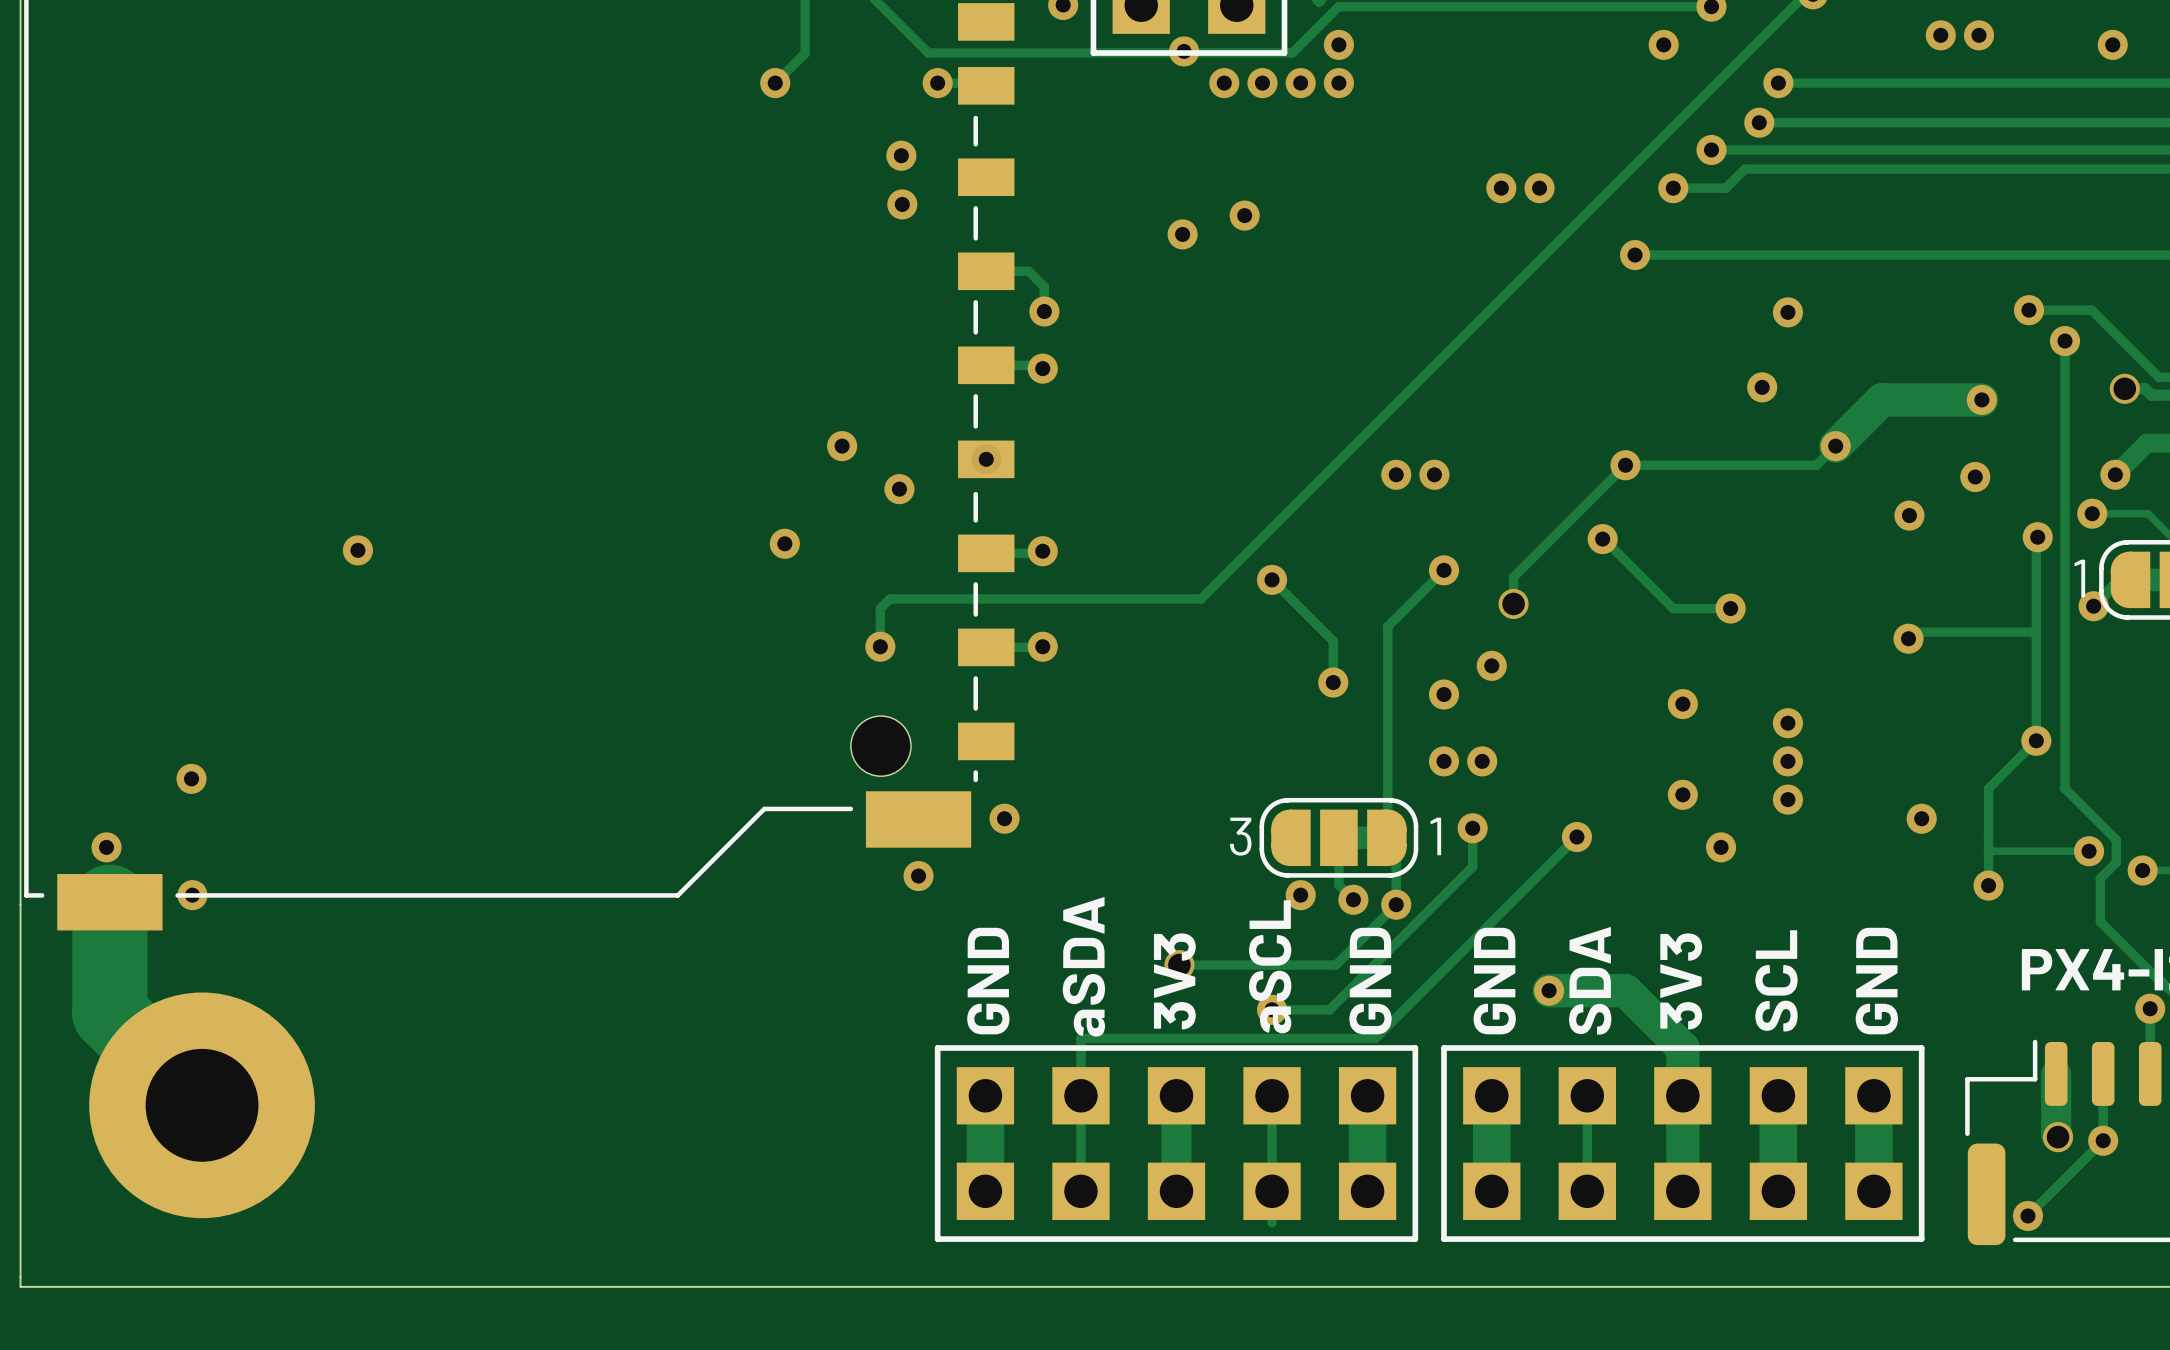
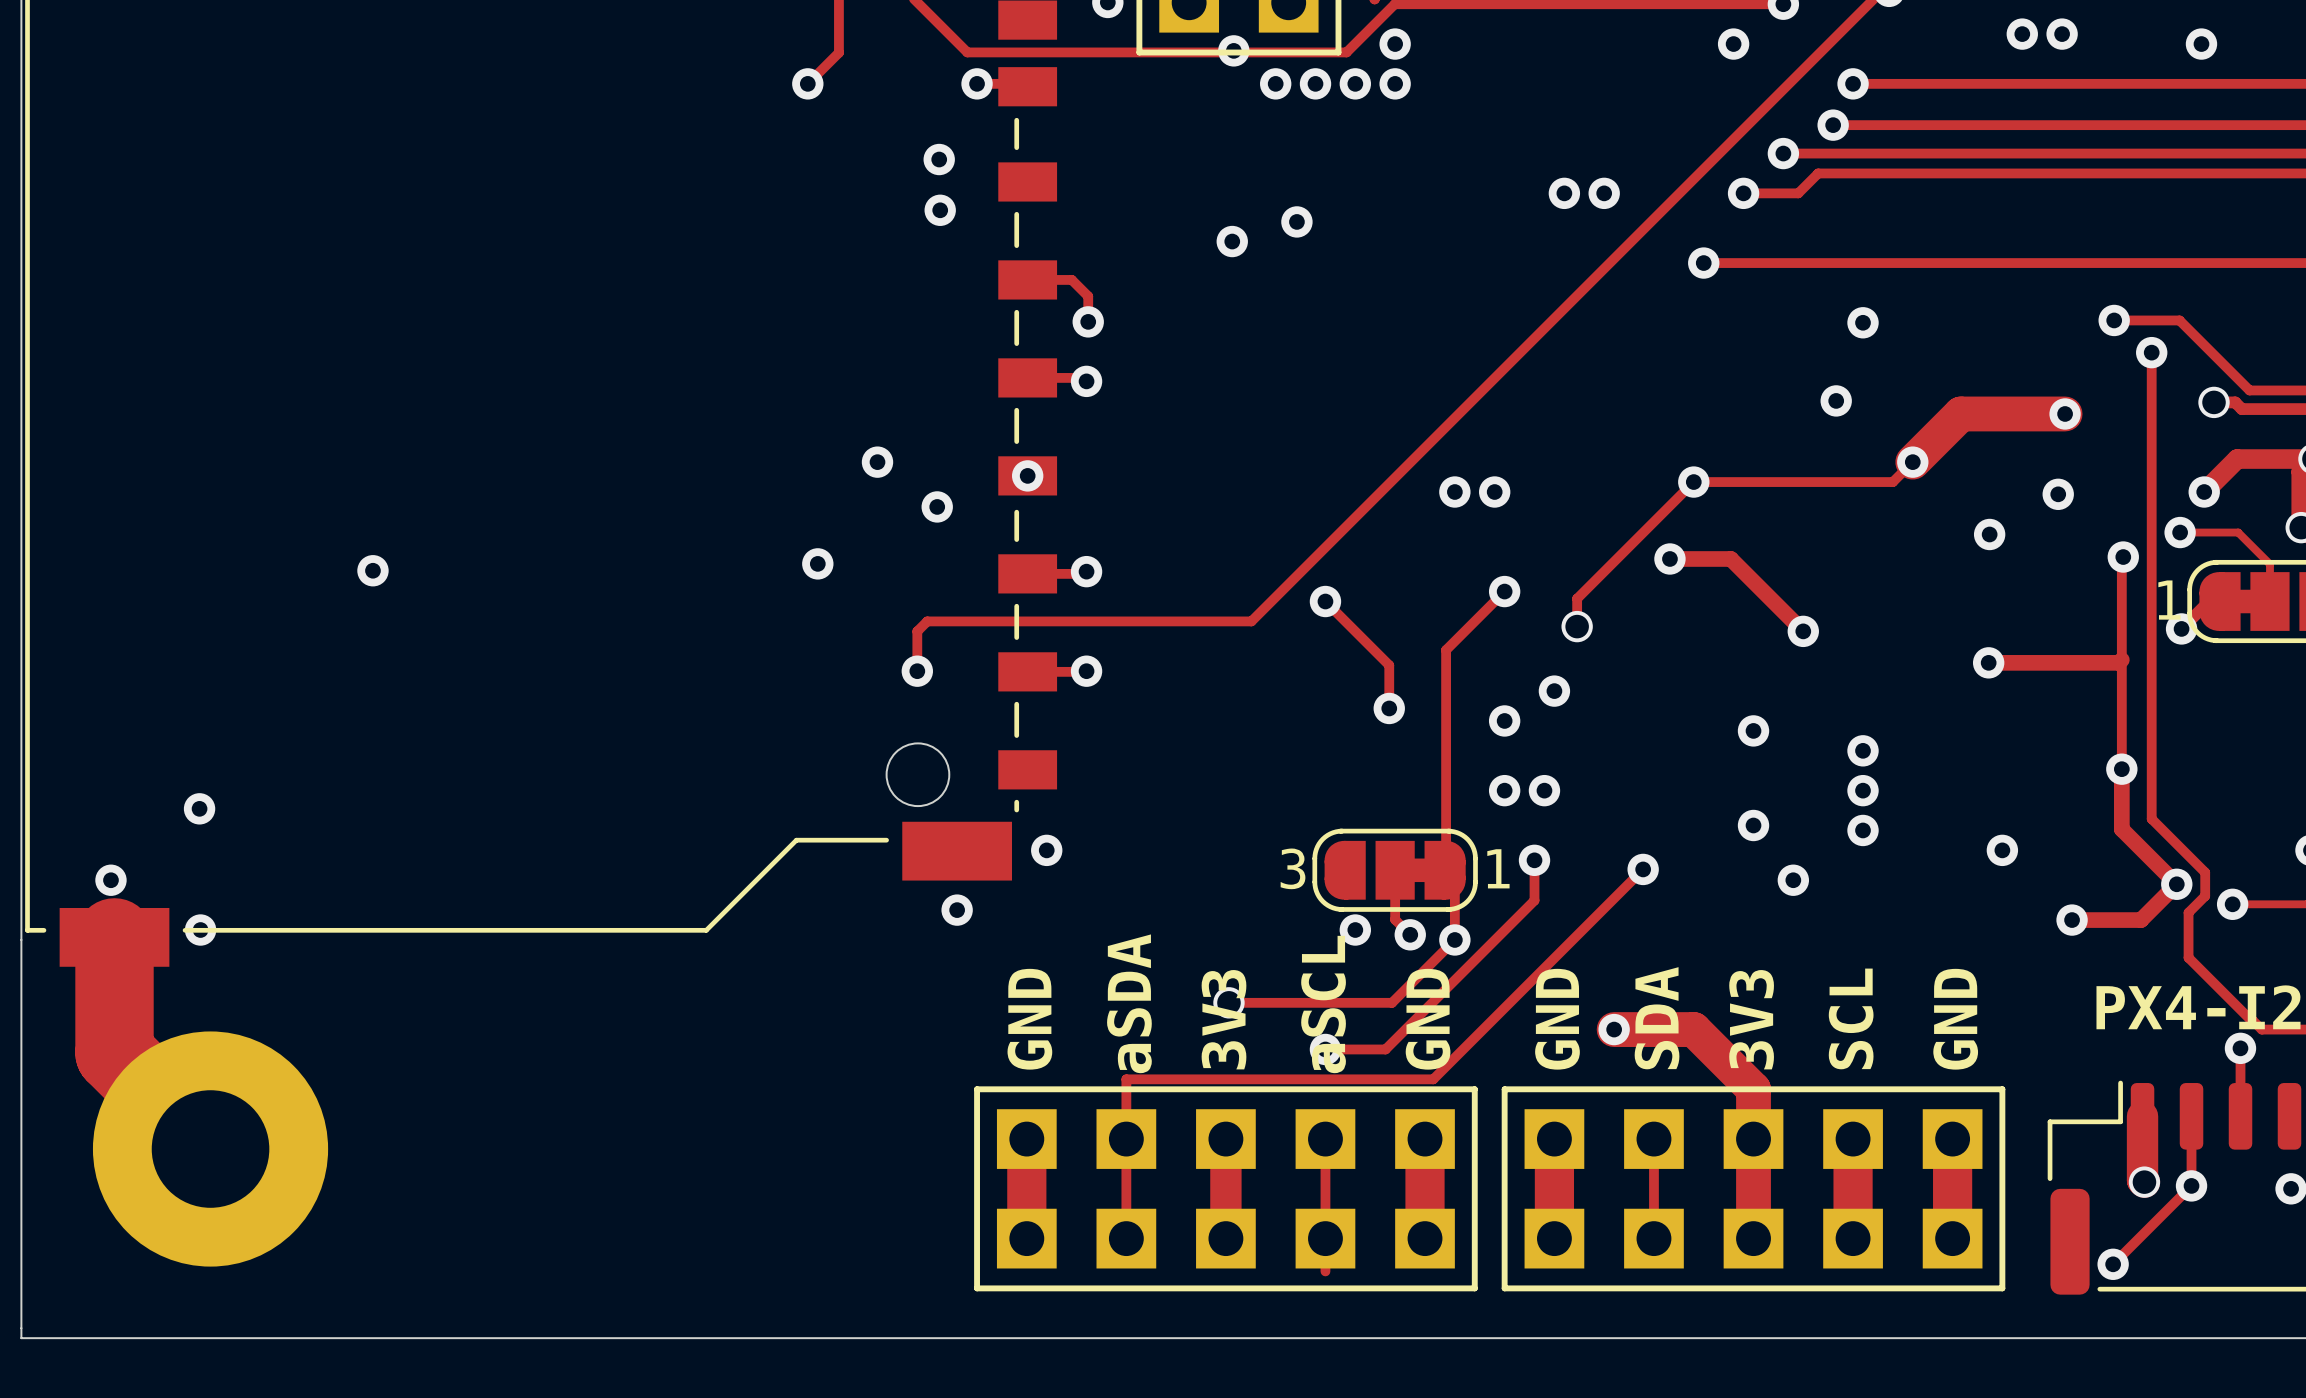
track: (1603, 539) (1673, 608) (1730, 608) -> (1669, 558) (1730, 558) (1803, 631)
track: (1915, 632) (2036, 632) -> none
track: none -> (2121, 659) (2118, 662) (1988, 662)
track: (2036, 740) (1988, 788) (1988, 885) -> (2121, 769) (2121, 829) (2176, 884) (2141, 920) (2072, 920)
track: (1988, 849) (1990, 851) (2089, 851) -> none

